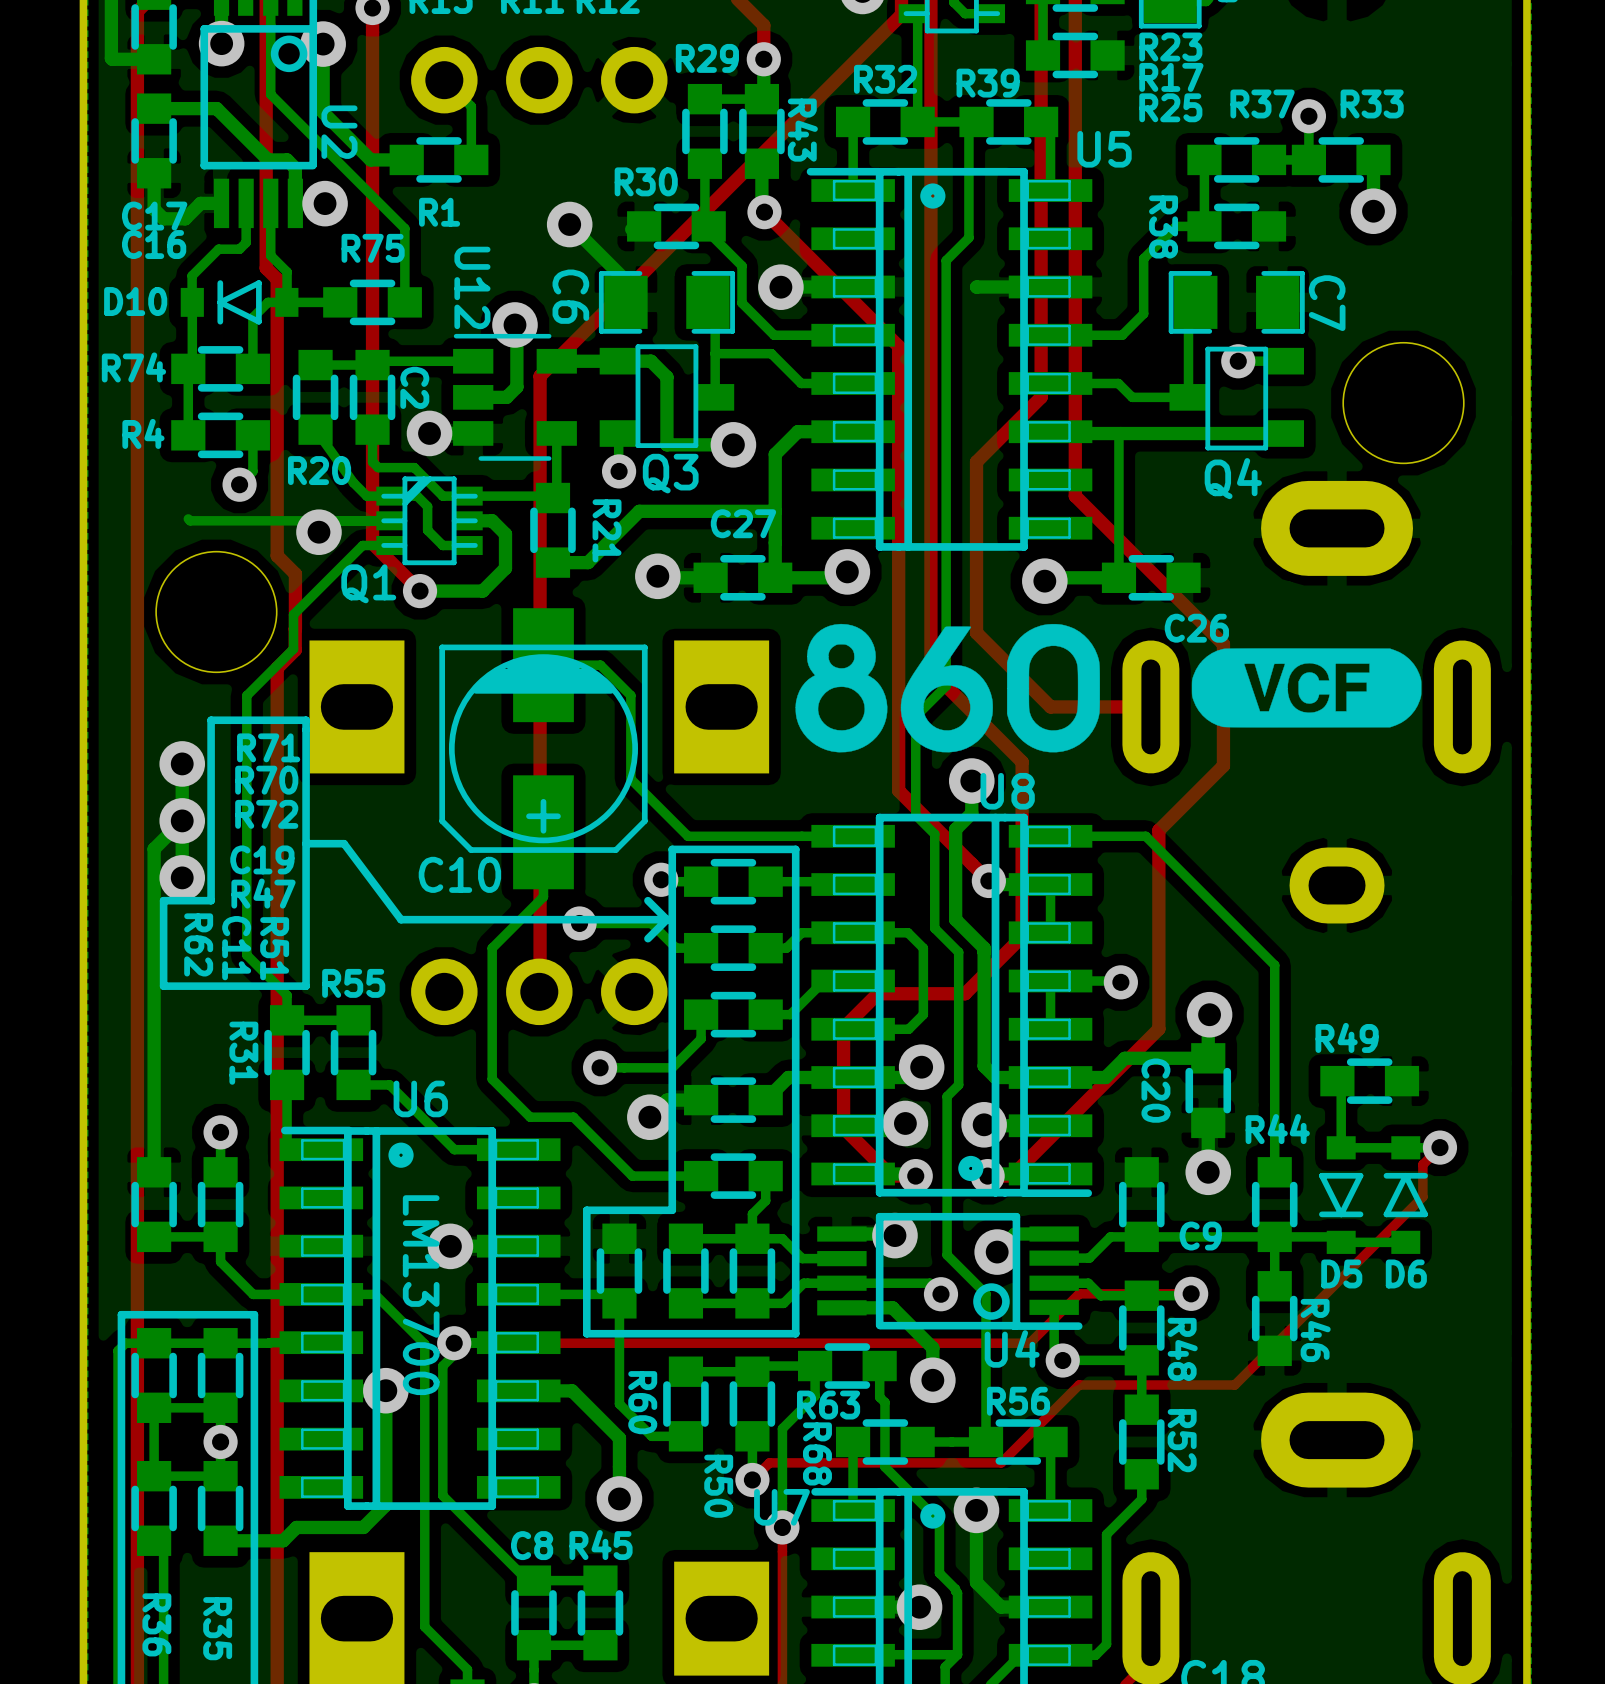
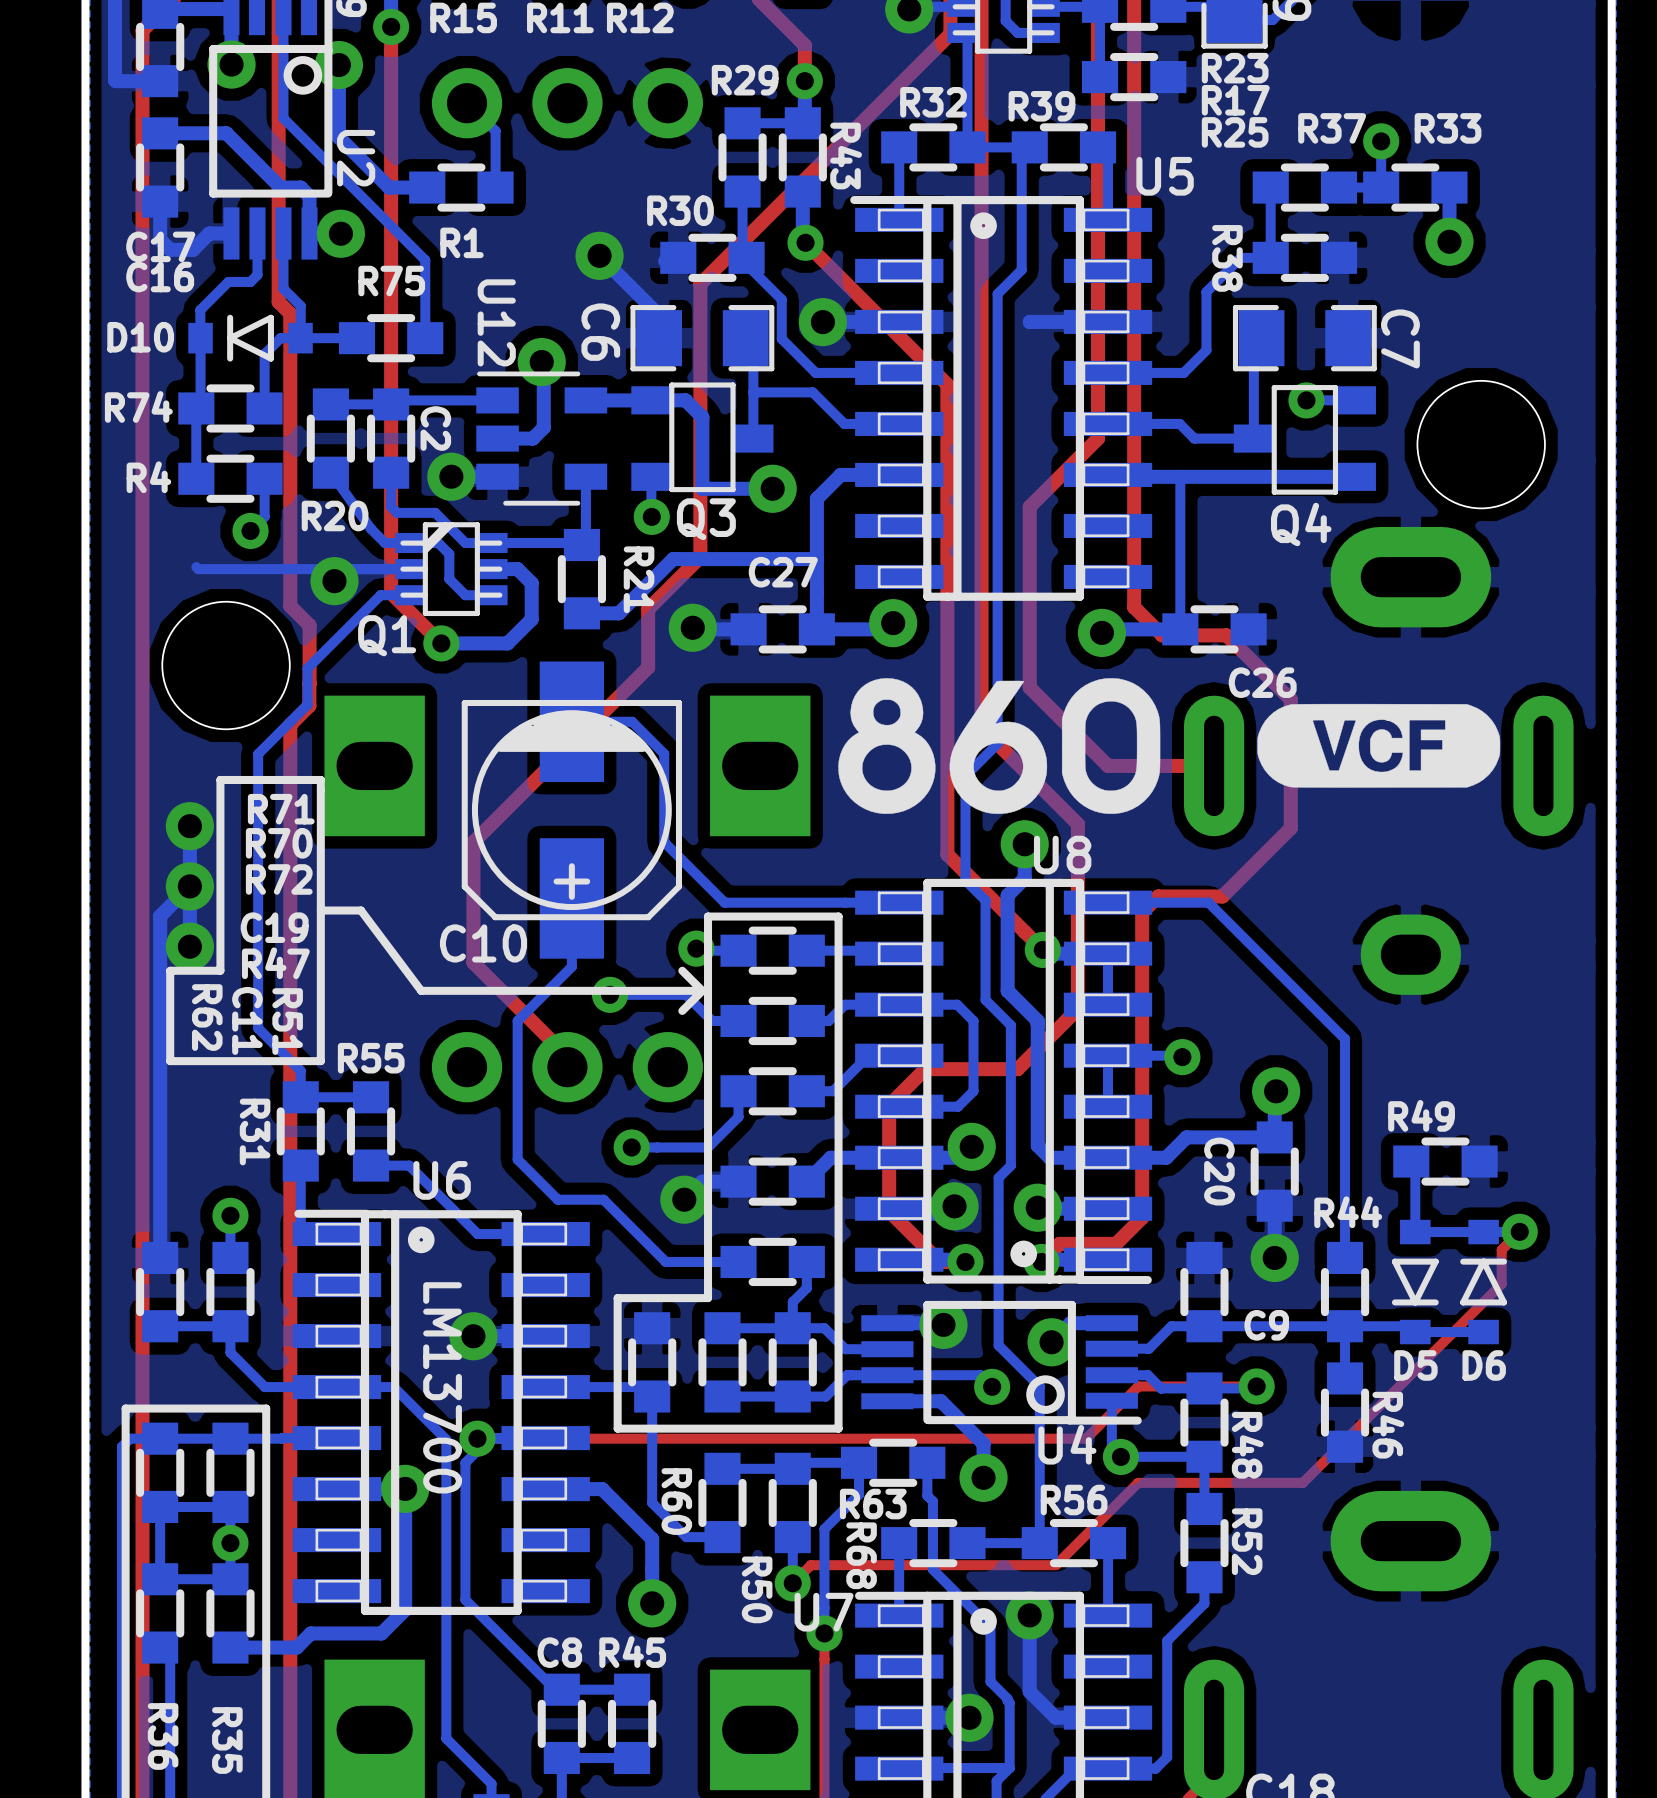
top track: (665, 251) (540, 376) (540, 982) -> (700, 284) (700, 557) (648, 609) (648, 667) (473, 842) (473, 962) (568, 1057)
top track: (1075, 496) (1162, 583) -> (1134, 543) (1134, 607) (1162, 635) (1226, 635)
top track: (1158, 830) (1158, 1029) (1011, 1176) (987, 1176) -> (1222, 896) (1158, 896) (1142, 912) (1142, 1217) (1116, 1243) (1059, 1243) (1041, 1261)

